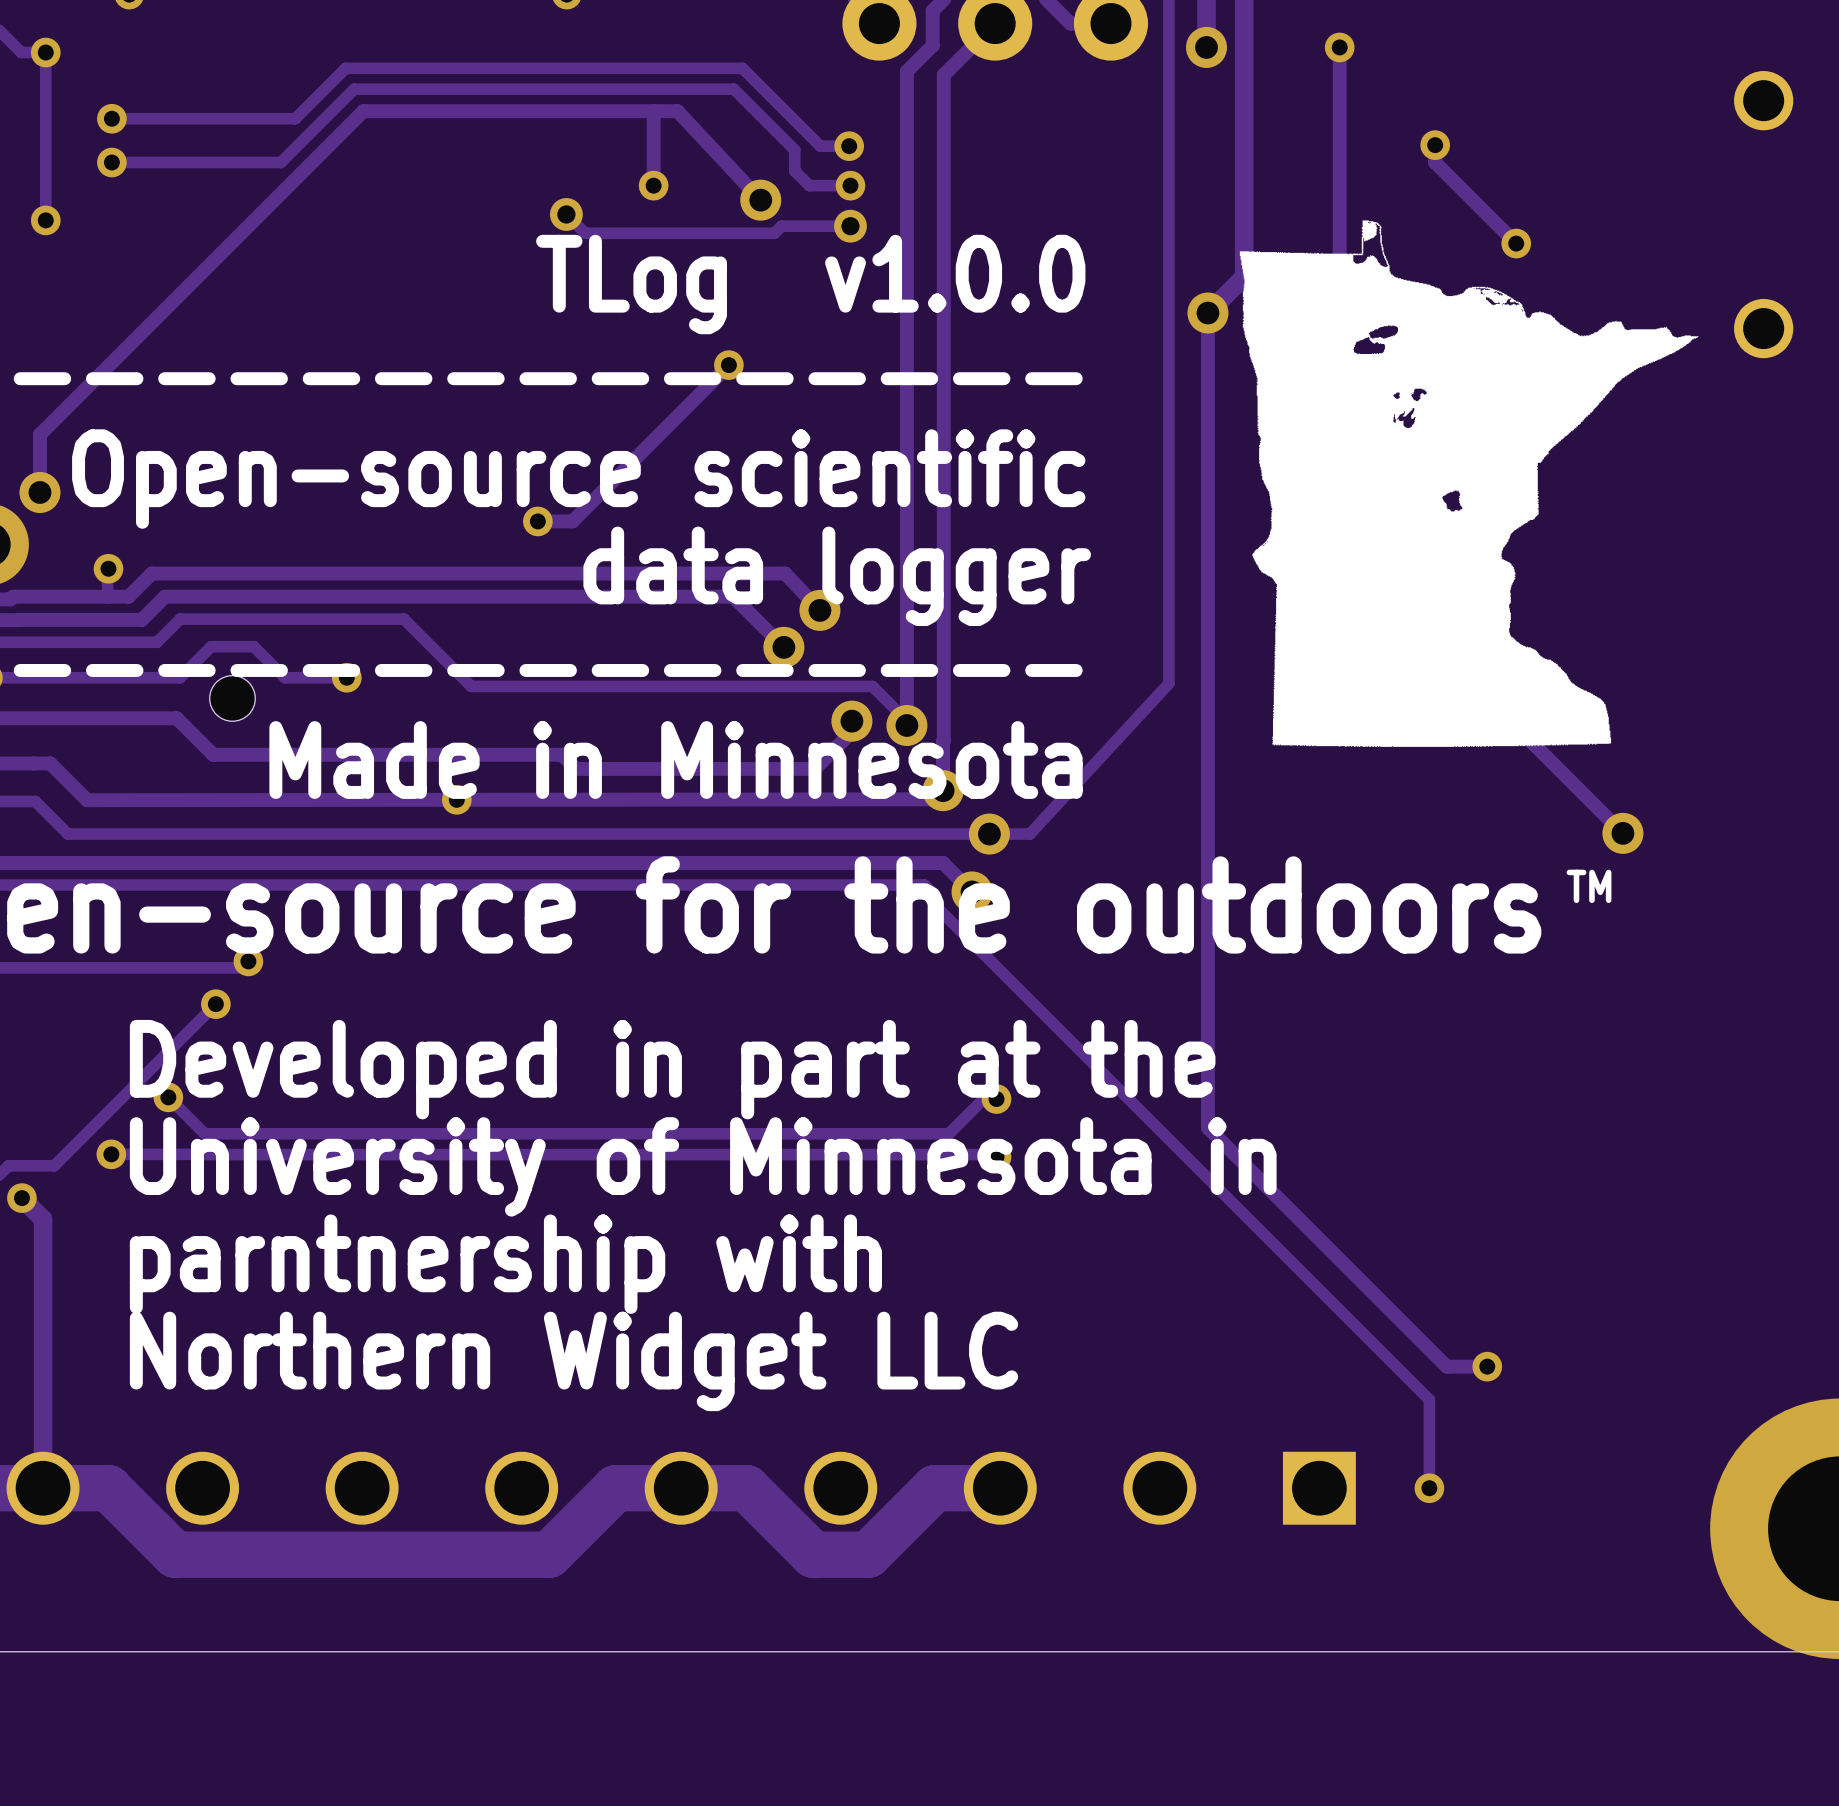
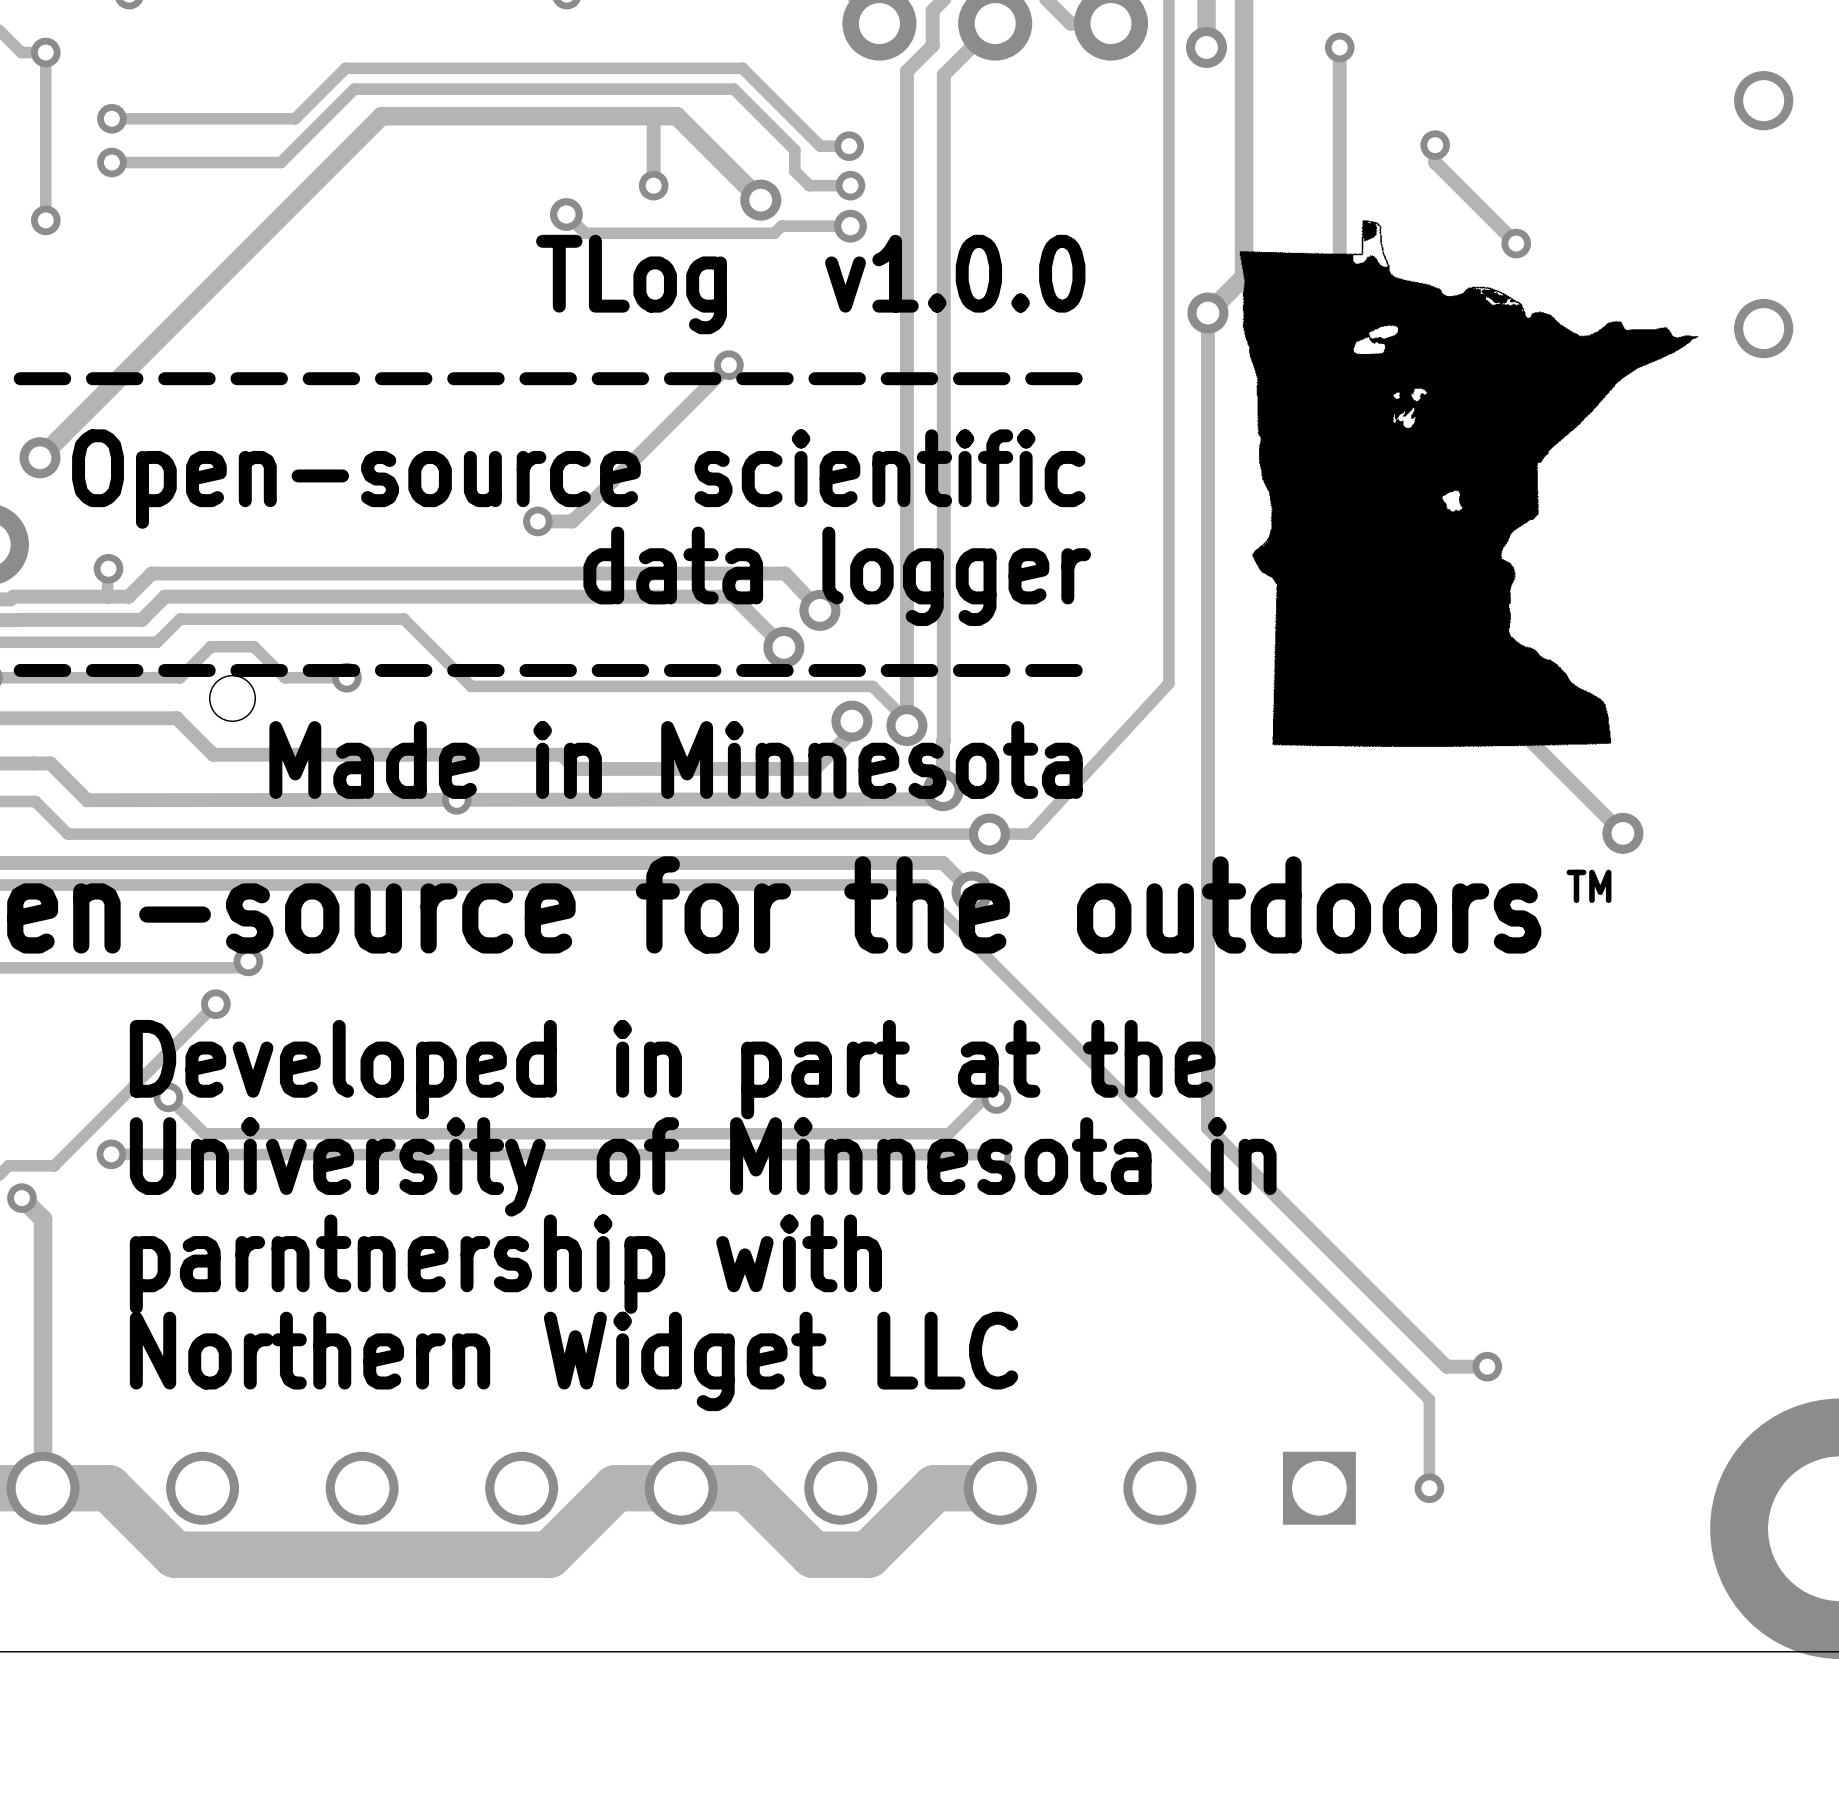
track: (760, 200) (677, 111) (363, 111) (39, 434) (39, 492) -> (760, 200) (676, 116) (381, 116) (39, 457)
via position: (39, 492) -> (39, 457)

